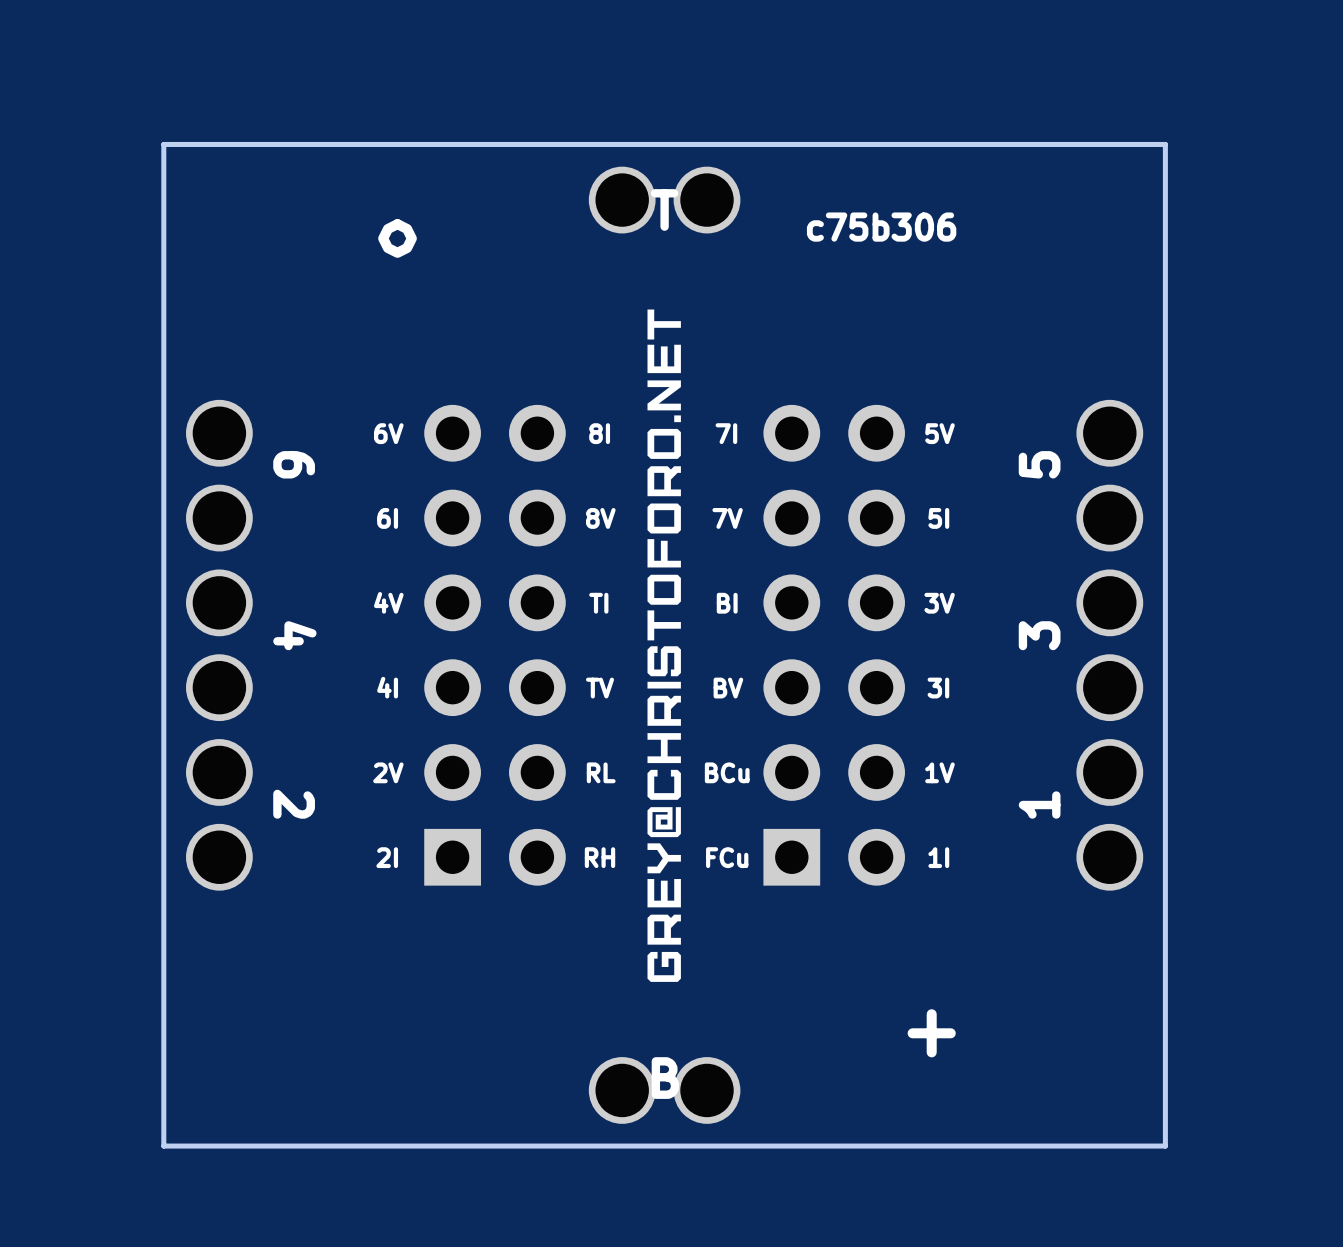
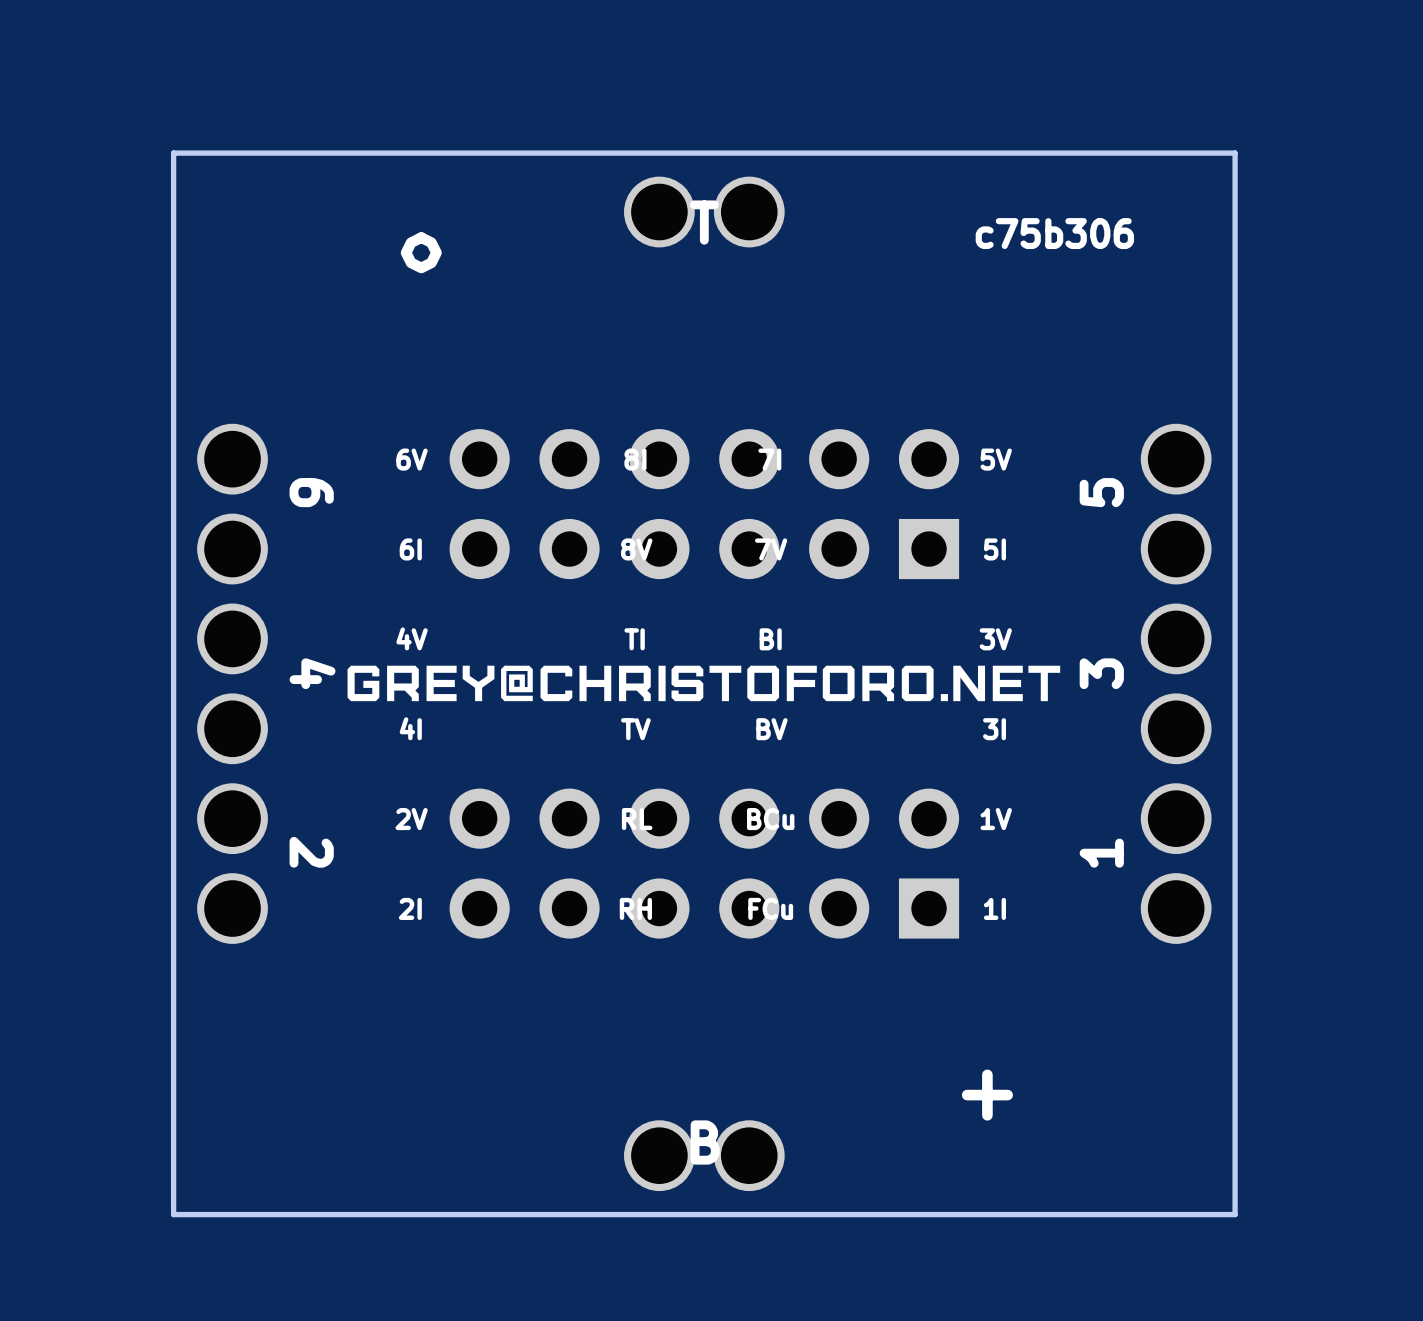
text position: c75b306 (881, 227) -> c75b306 (1054, 233)
drawing shape: [647, 309, 681, 982] -> [347, 665, 1061, 702]
part: none -> (704, 504)
part: (495, 645) -> none
part: (834, 645) -> none
part: none -> (704, 863)

